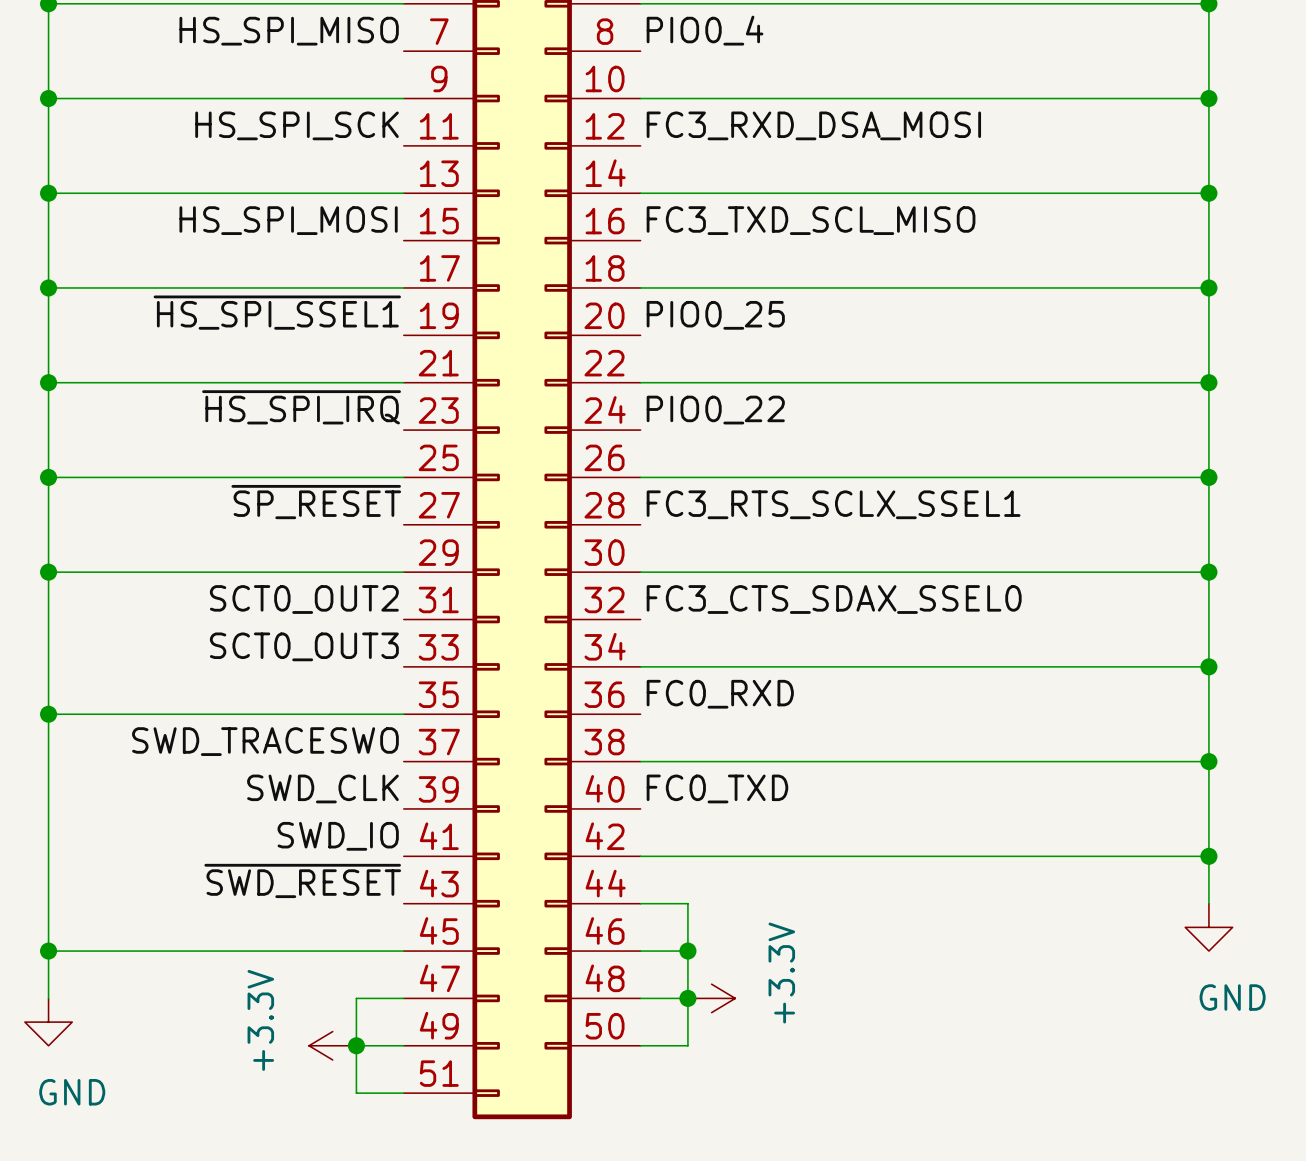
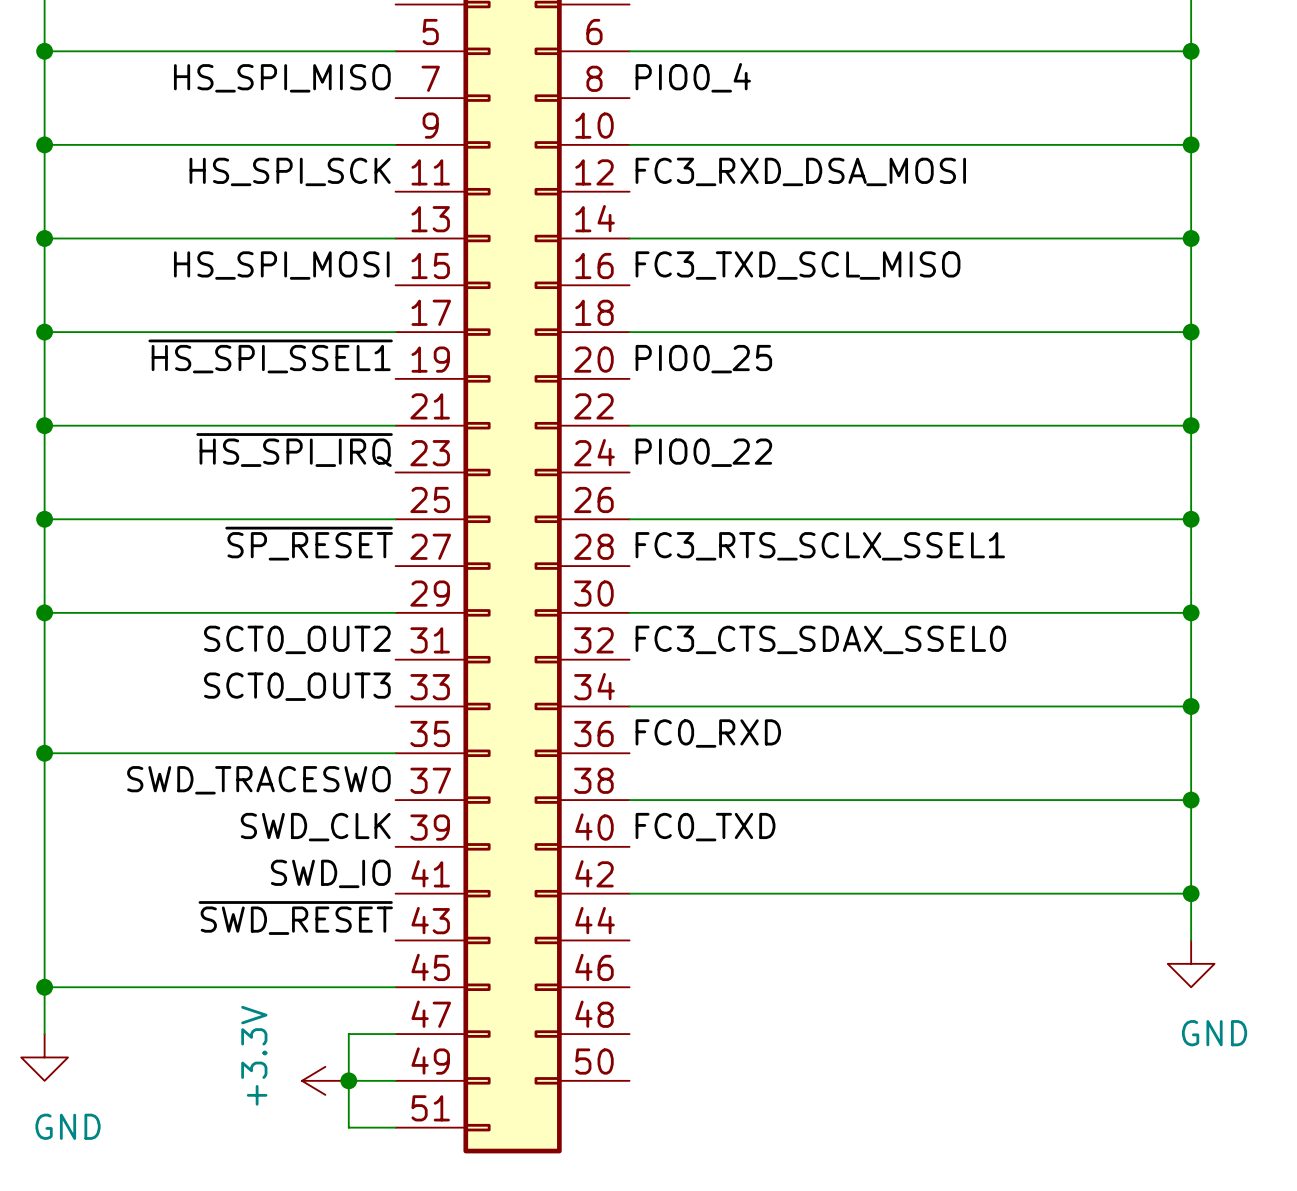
wire: (640, 903) (687, 903) (687, 1045) (640, 1045) -> none
wire: (640, 951) (687, 951) -> none
junction: (687, 951) -> none
wire: (640, 998) (687, 998) -> none
junction: (687, 998) -> none
power symbol: +3.3V (711, 998) -> none

